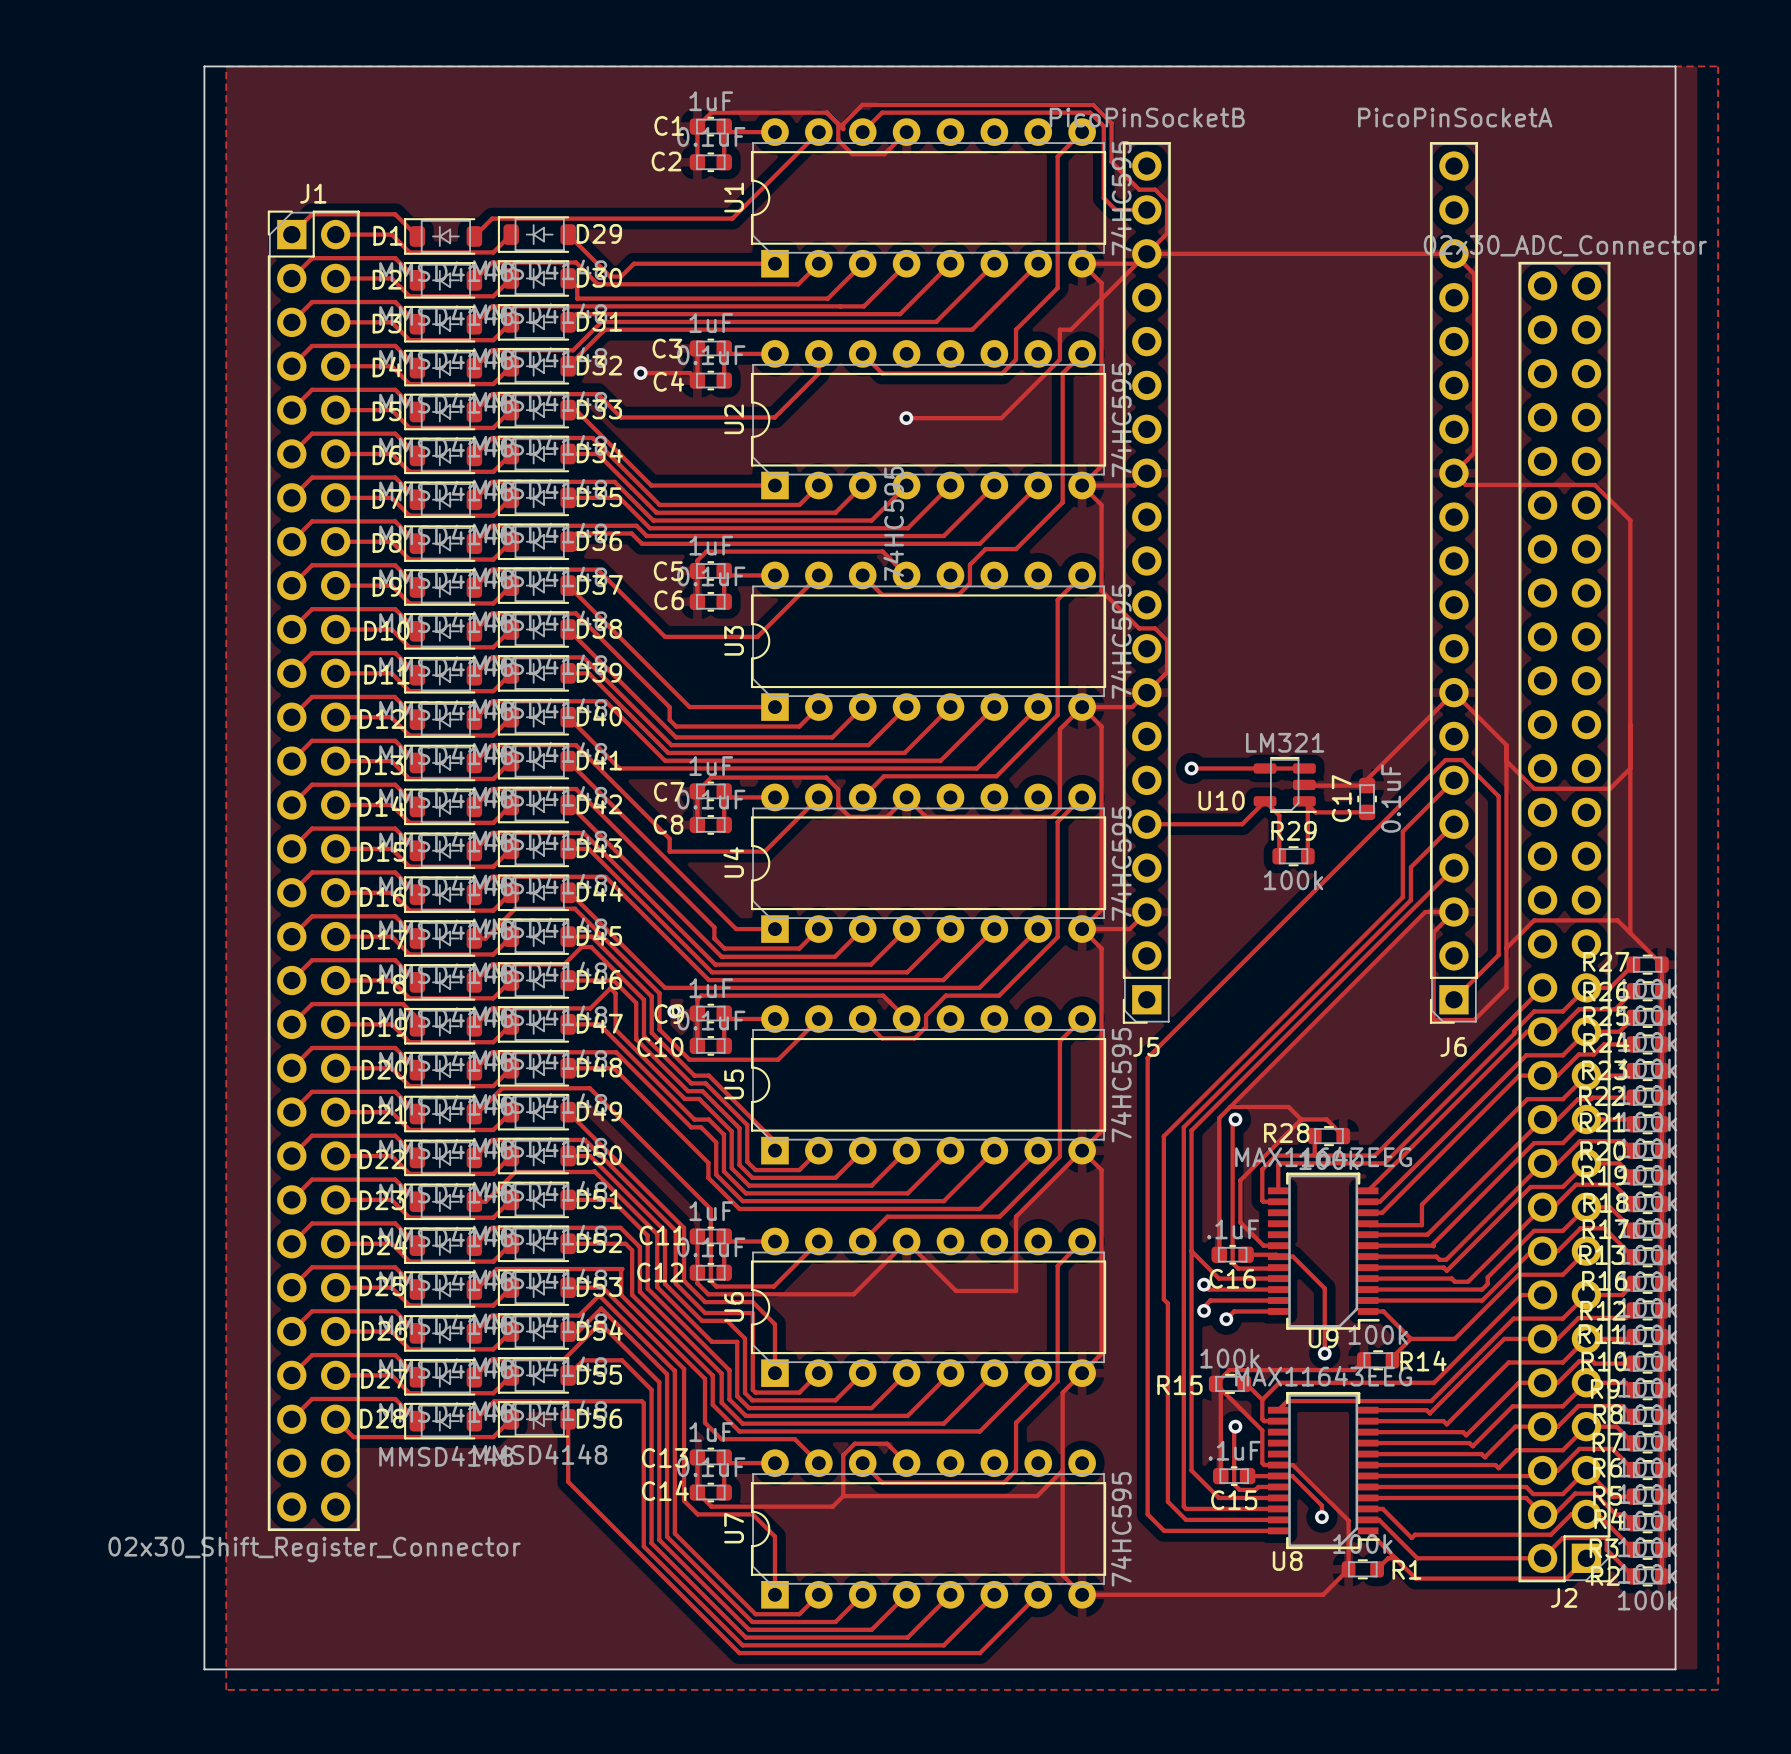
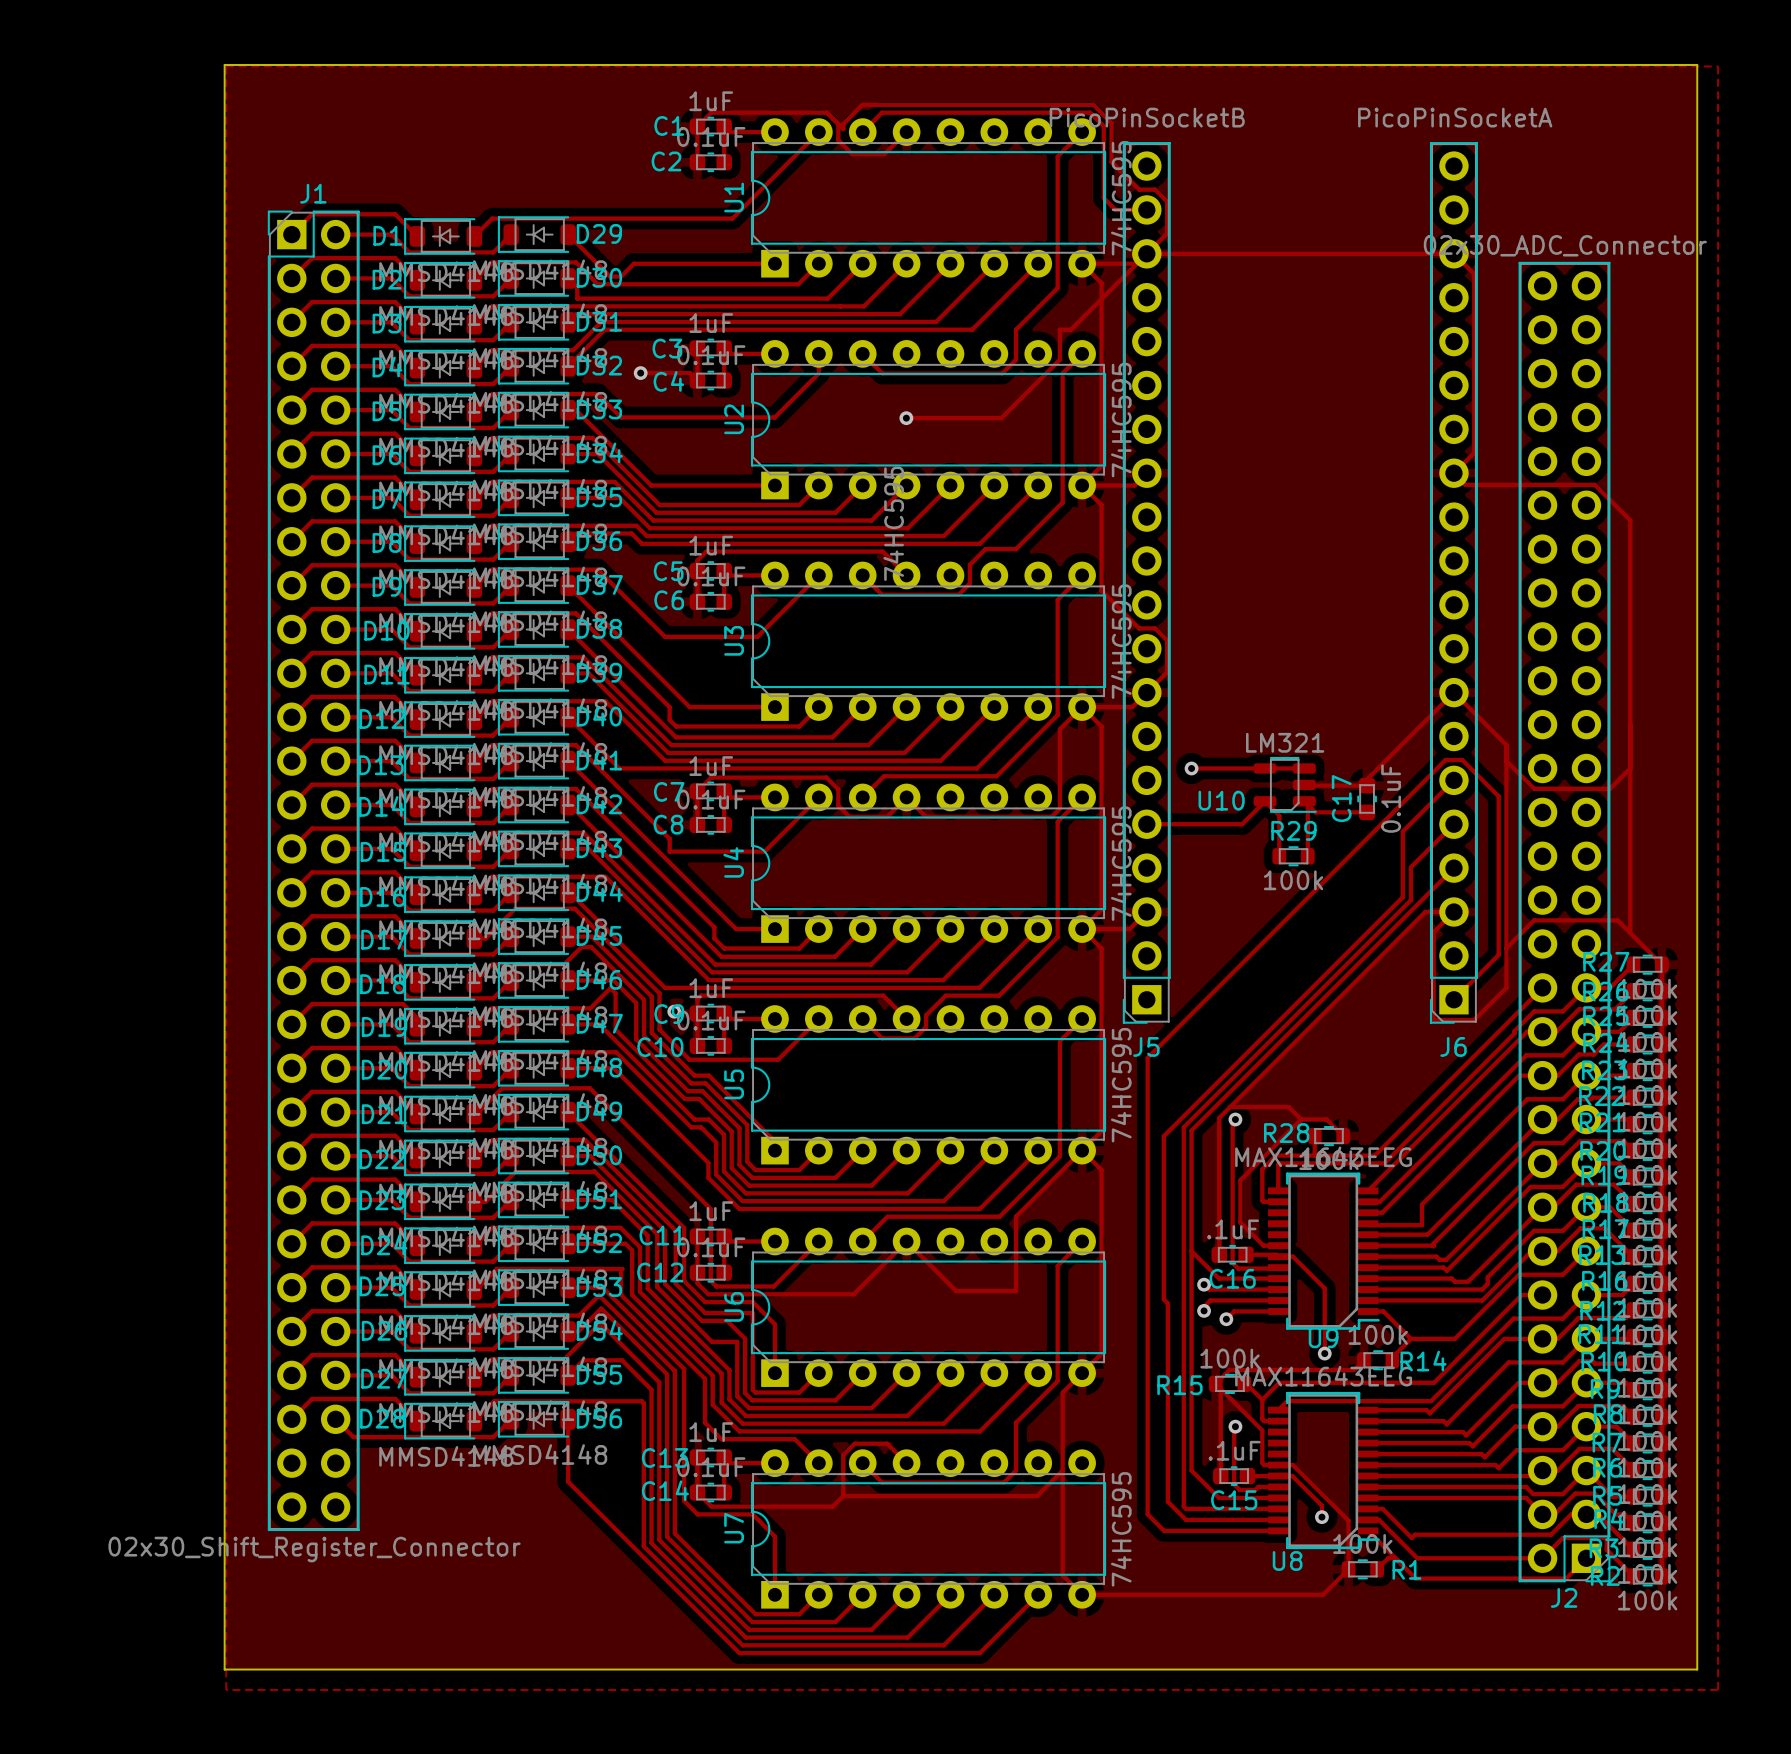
board edge: (204, 66) (1675, 66) (1675, 1669) (204, 1669) (204, 66) -> (224, 64) (224, 1669) (1697, 1669) (1697, 64) (224, 64)

